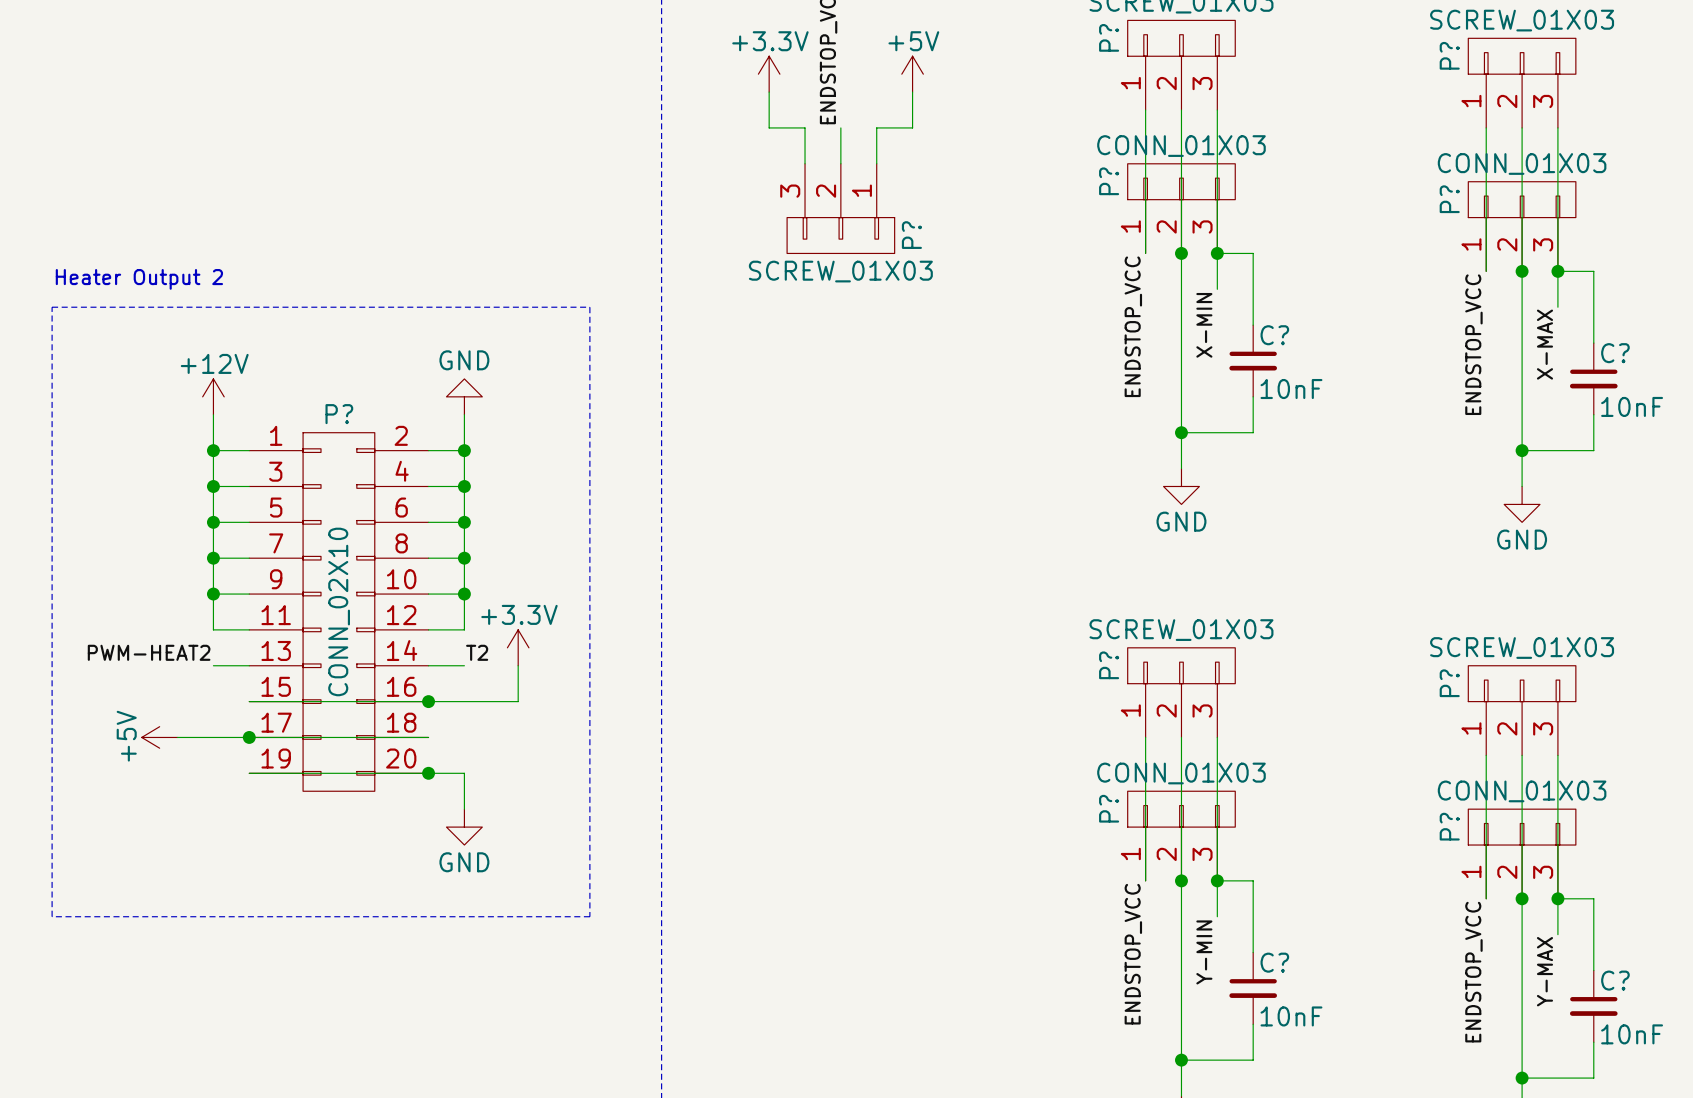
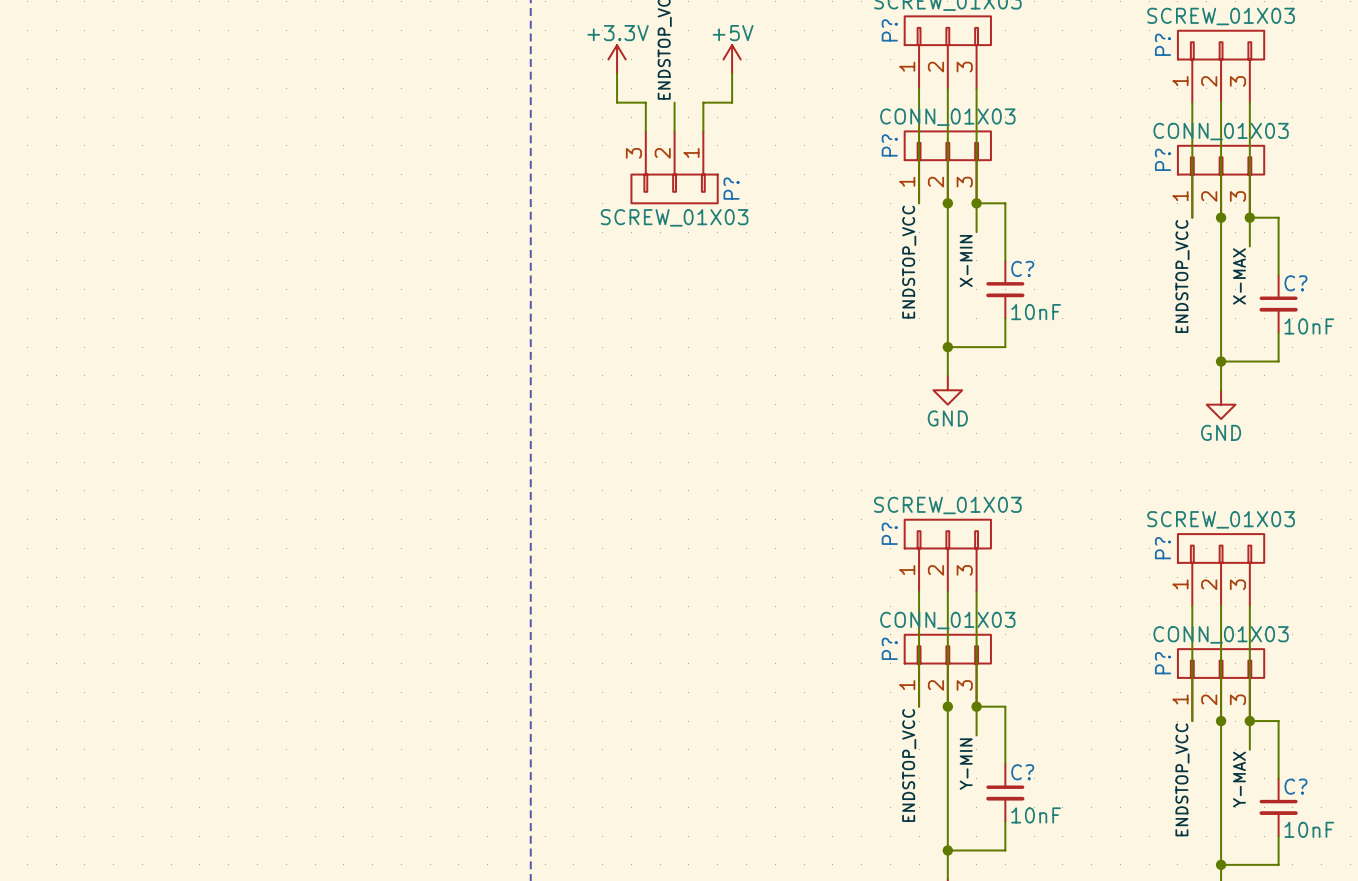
text: Heater Output 2 (139, 279) -> none
line: (52, 307) (589, 307) (589, 916) (52, 916) (52, 307) -> none
power symbol: +12V (213, 396) -> none
power symbol: GND (464, 396) -> none
wire: (213, 414) (213, 629) (249, 629) -> none
wire: (464, 414) (464, 629) (428, 629) -> none
wire: (213, 450) (249, 450) -> none
junction: (213, 450) -> none
wire: (428, 450) (464, 450) -> none
junction: (464, 450) -> none
wire: (213, 486) (249, 486) -> none
junction: (213, 486) -> none
wire: (428, 486) (464, 486) -> none
junction: (464, 486) -> none
wire: (213, 522) (249, 522) -> none
junction: (213, 522) -> none
wire: (428, 522) (464, 522) -> none
junction: (464, 522) -> none
wire: (213, 558) (249, 558) -> none
junction: (213, 558) -> none
wire: (428, 558) (464, 558) -> none
junction: (464, 558) -> none
wire: (213, 594) (249, 594) -> none
junction: (213, 594) -> none
wire: (428, 594) (464, 594) -> none
junction: (464, 594) -> none
P?: CONN_02X10 (338, 611) -> none
power symbol: +3.3V (518, 647) -> none
label: PWM-HEAT2 (149, 652) -> none
label: T2 (477, 652) -> none
wire: (213, 665) (249, 665) -> none
wire: (428, 665) (464, 665) -> none
wire: (518, 665) (518, 701) (249, 701) -> none
junction: (428, 701) -> none
power symbol: +5V (159, 737) -> none
wire: (177, 737) (428, 737) -> none
junction: (249, 737) -> none
wire: (249, 773) (464, 773) (464, 809) -> none
junction: (428, 773) -> none
power symbol: GND (464, 827) -> none

